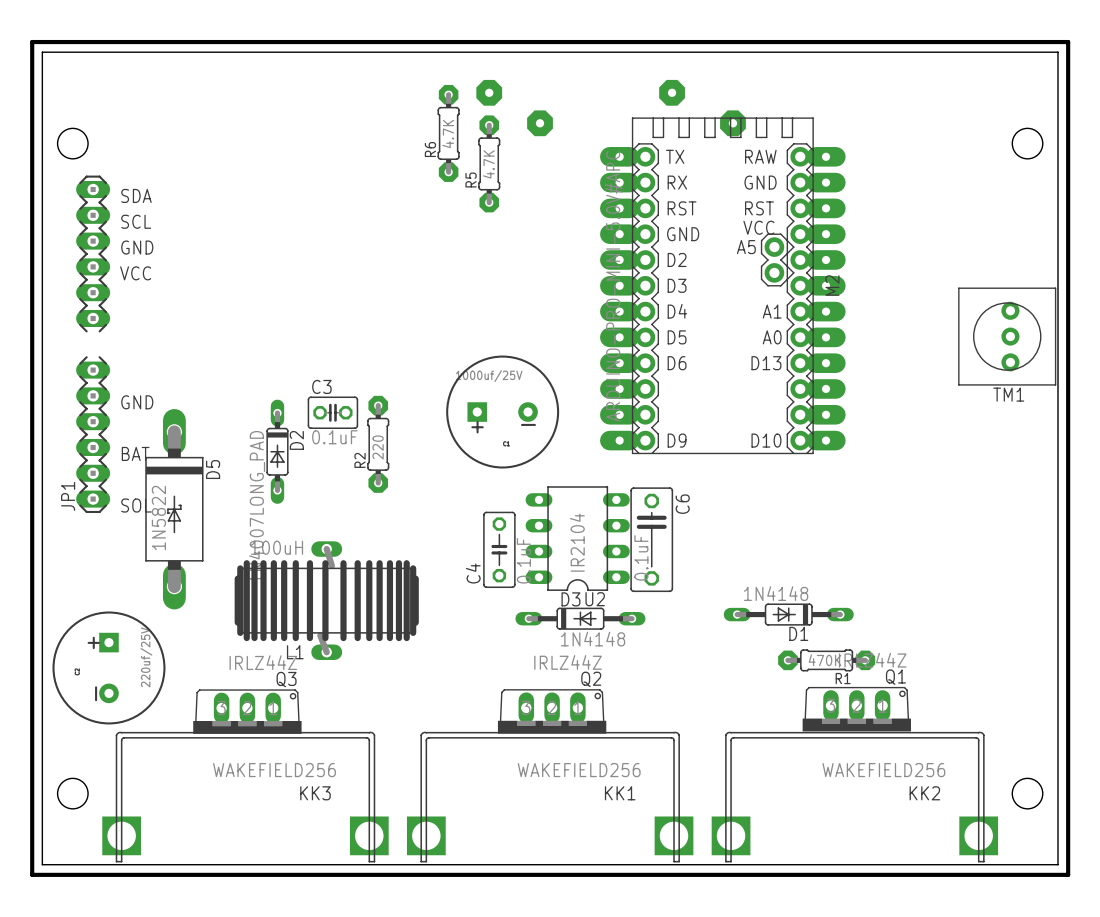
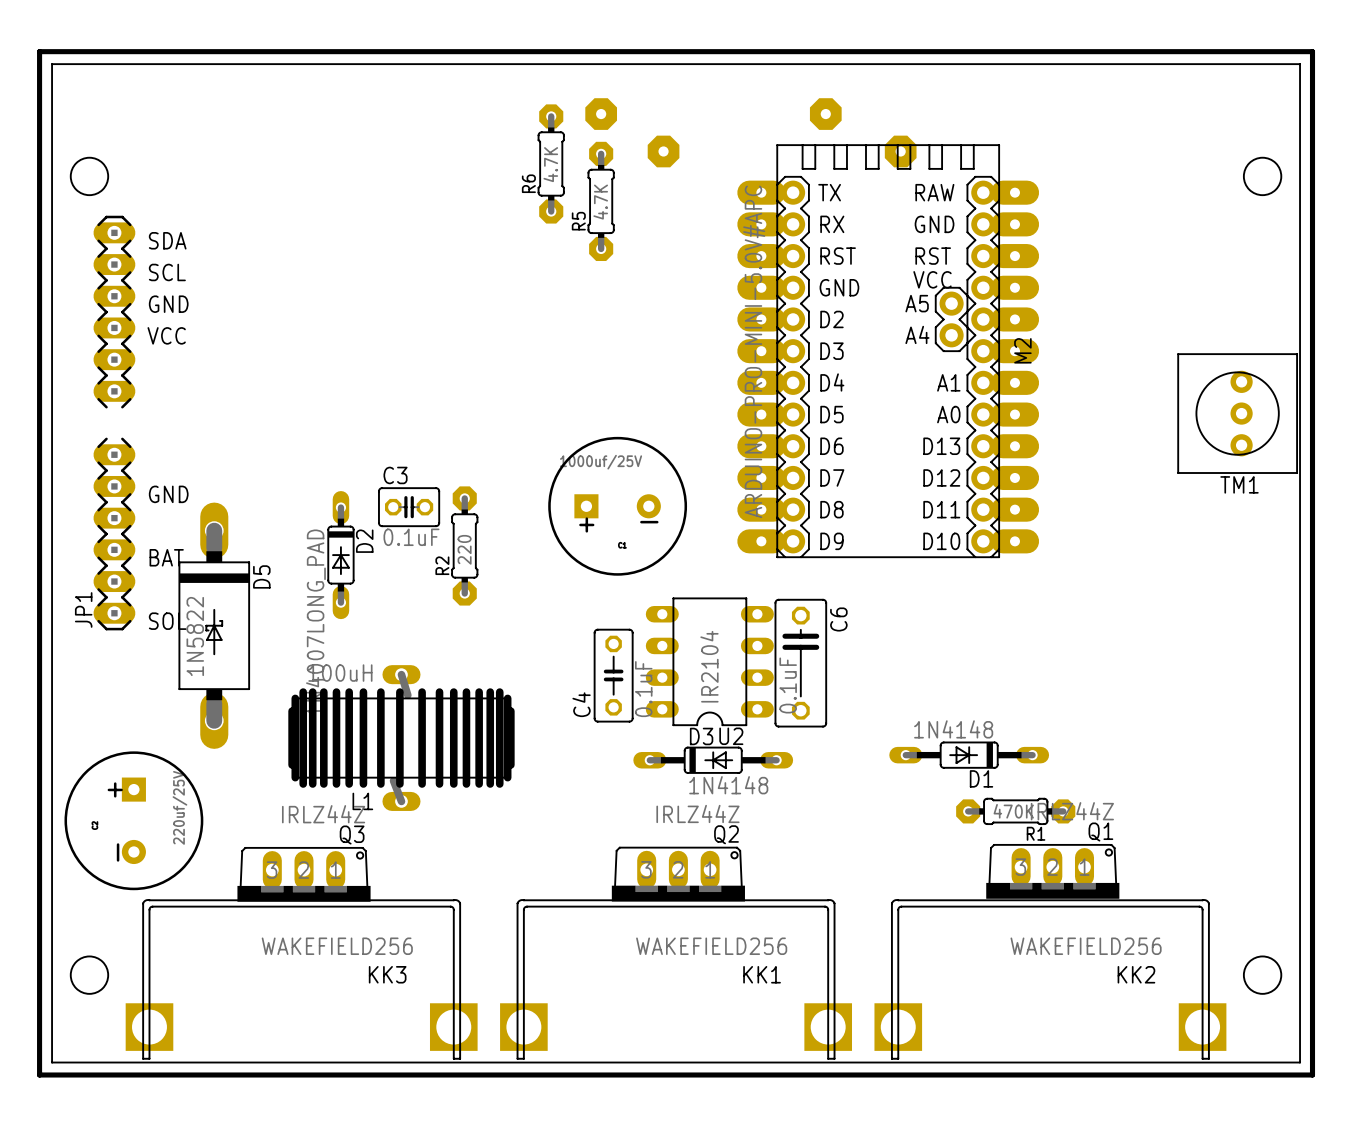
M2 text: none -> A4 (917, 334)
M2 text: none -> D7 (832, 477)
M2 text: none -> D12 (941, 477)
M2 text: none -> D8 (831, 509)
M2 text: none -> D11 (941, 509)

